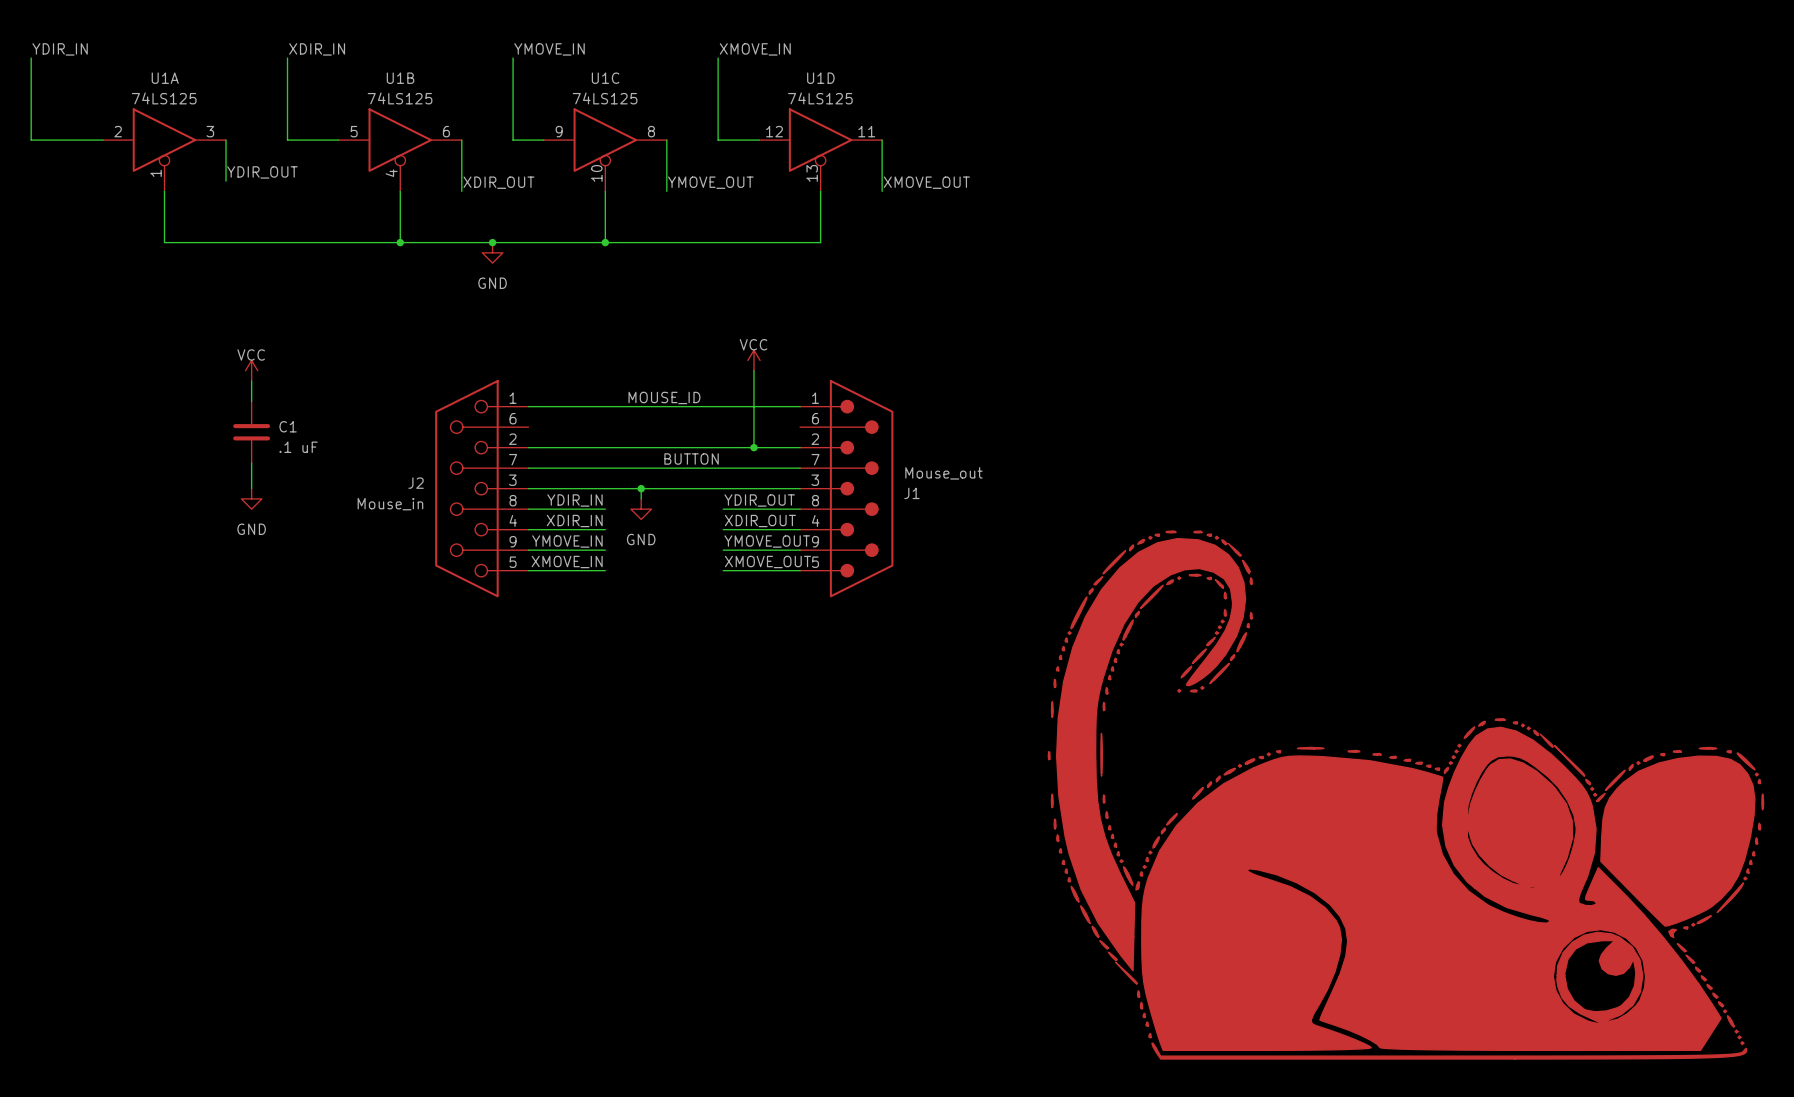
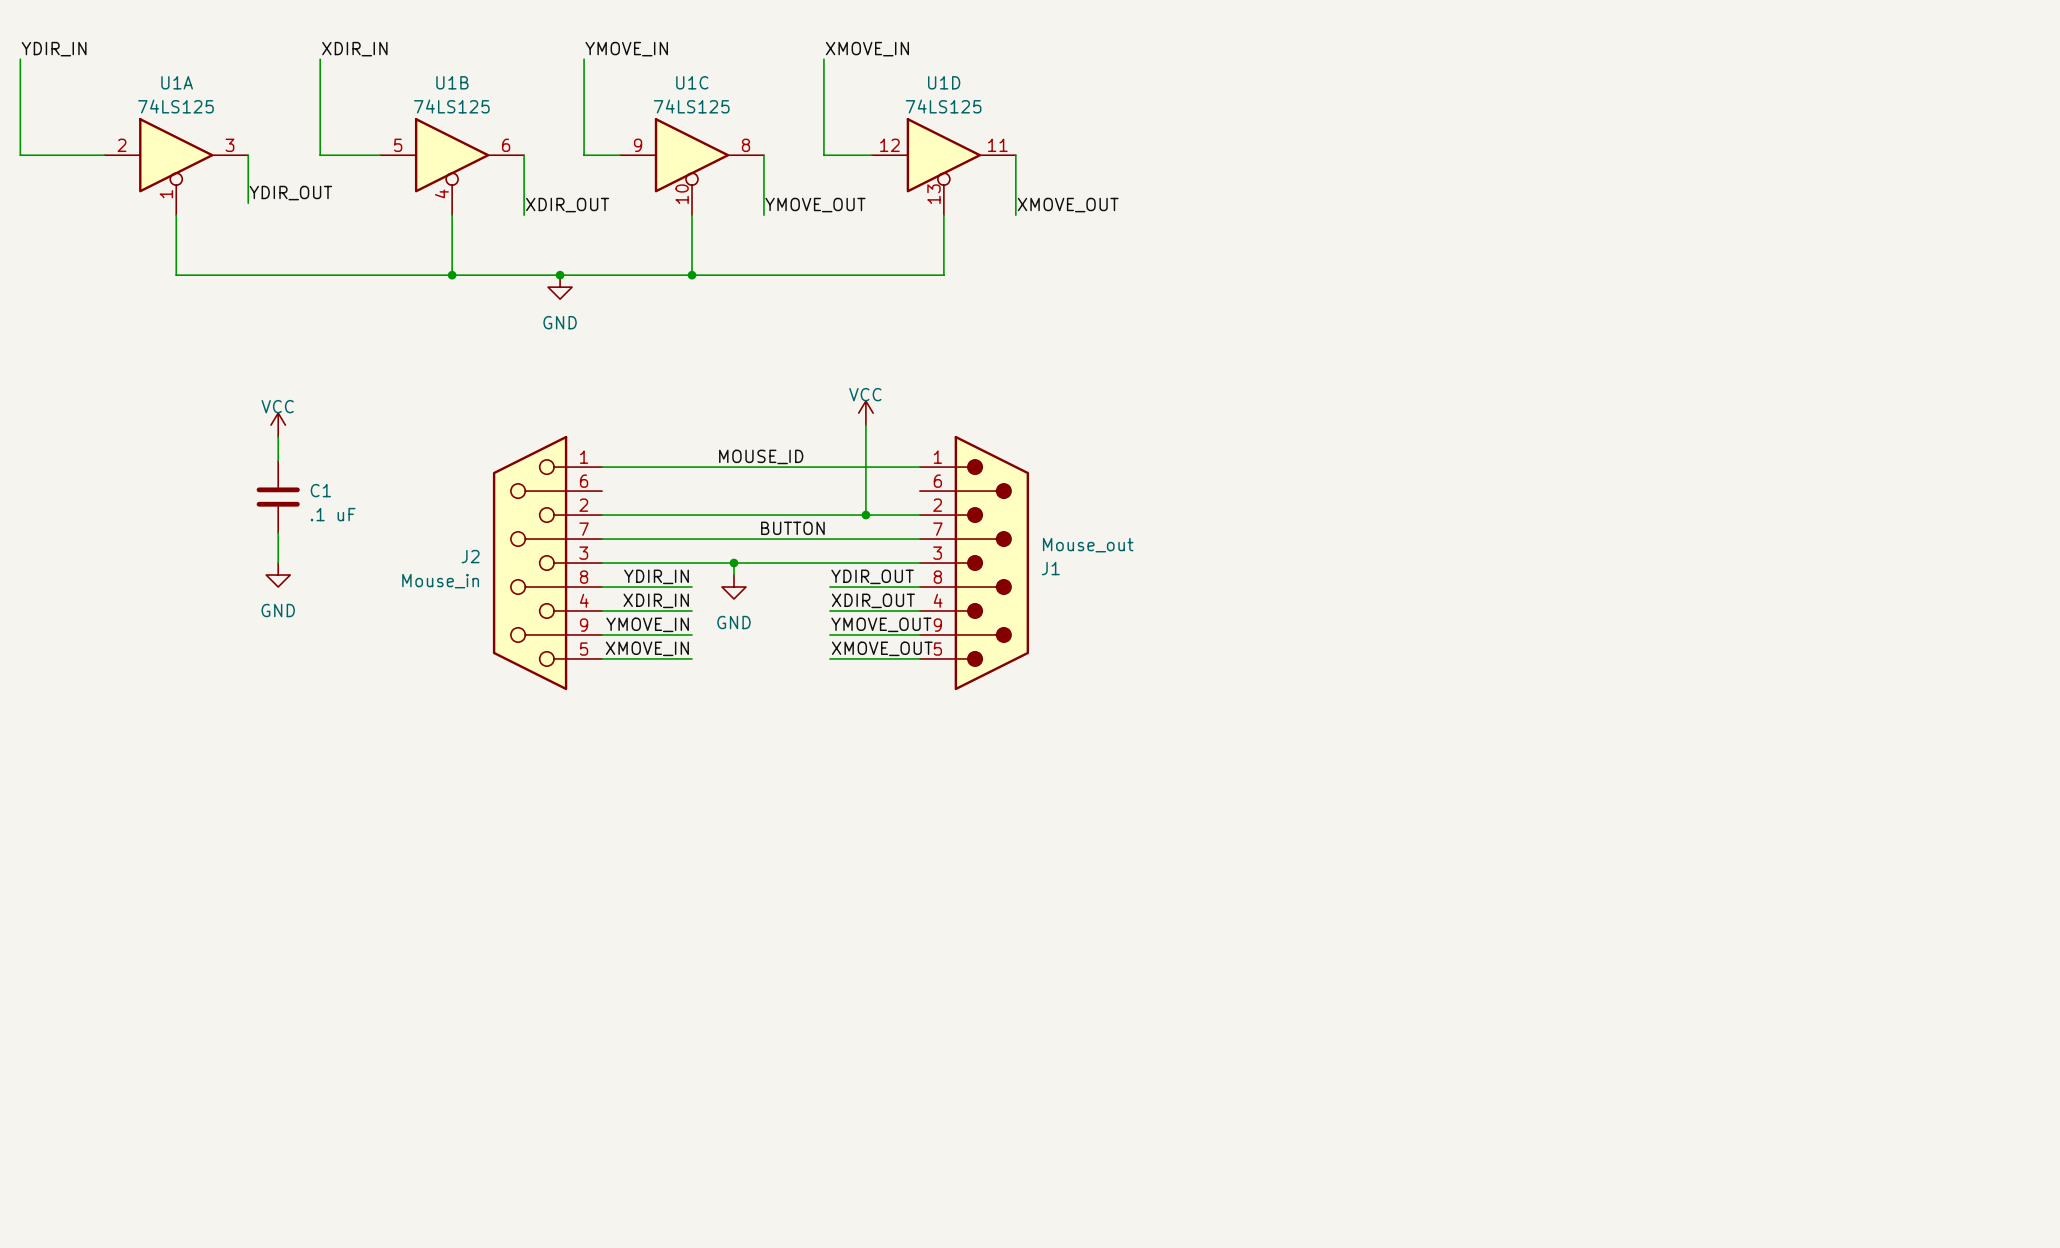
part: (1405, 795) -> none

